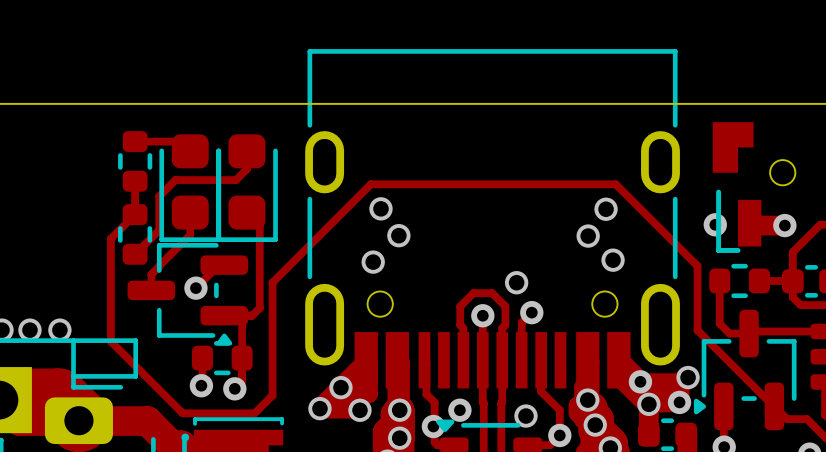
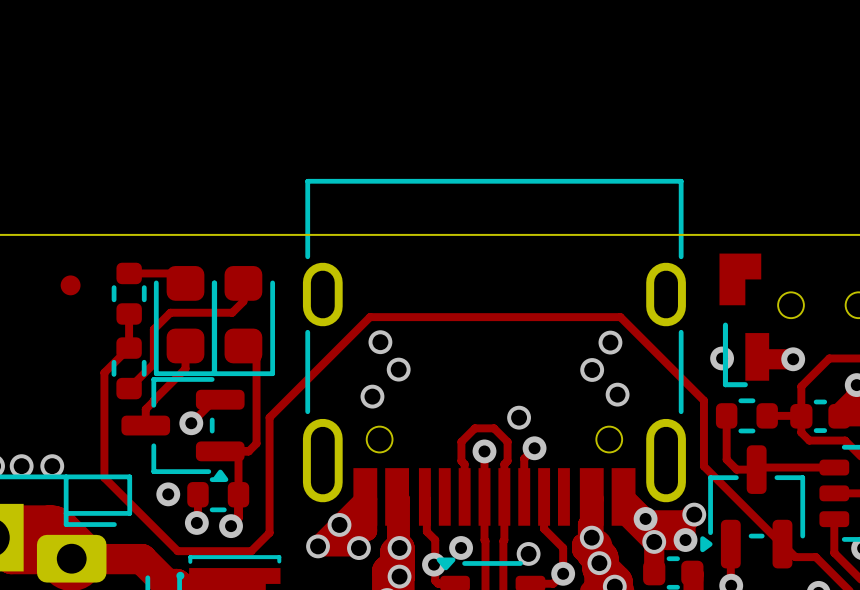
part: none -> (70, 285)
via: none -> (168, 494)

